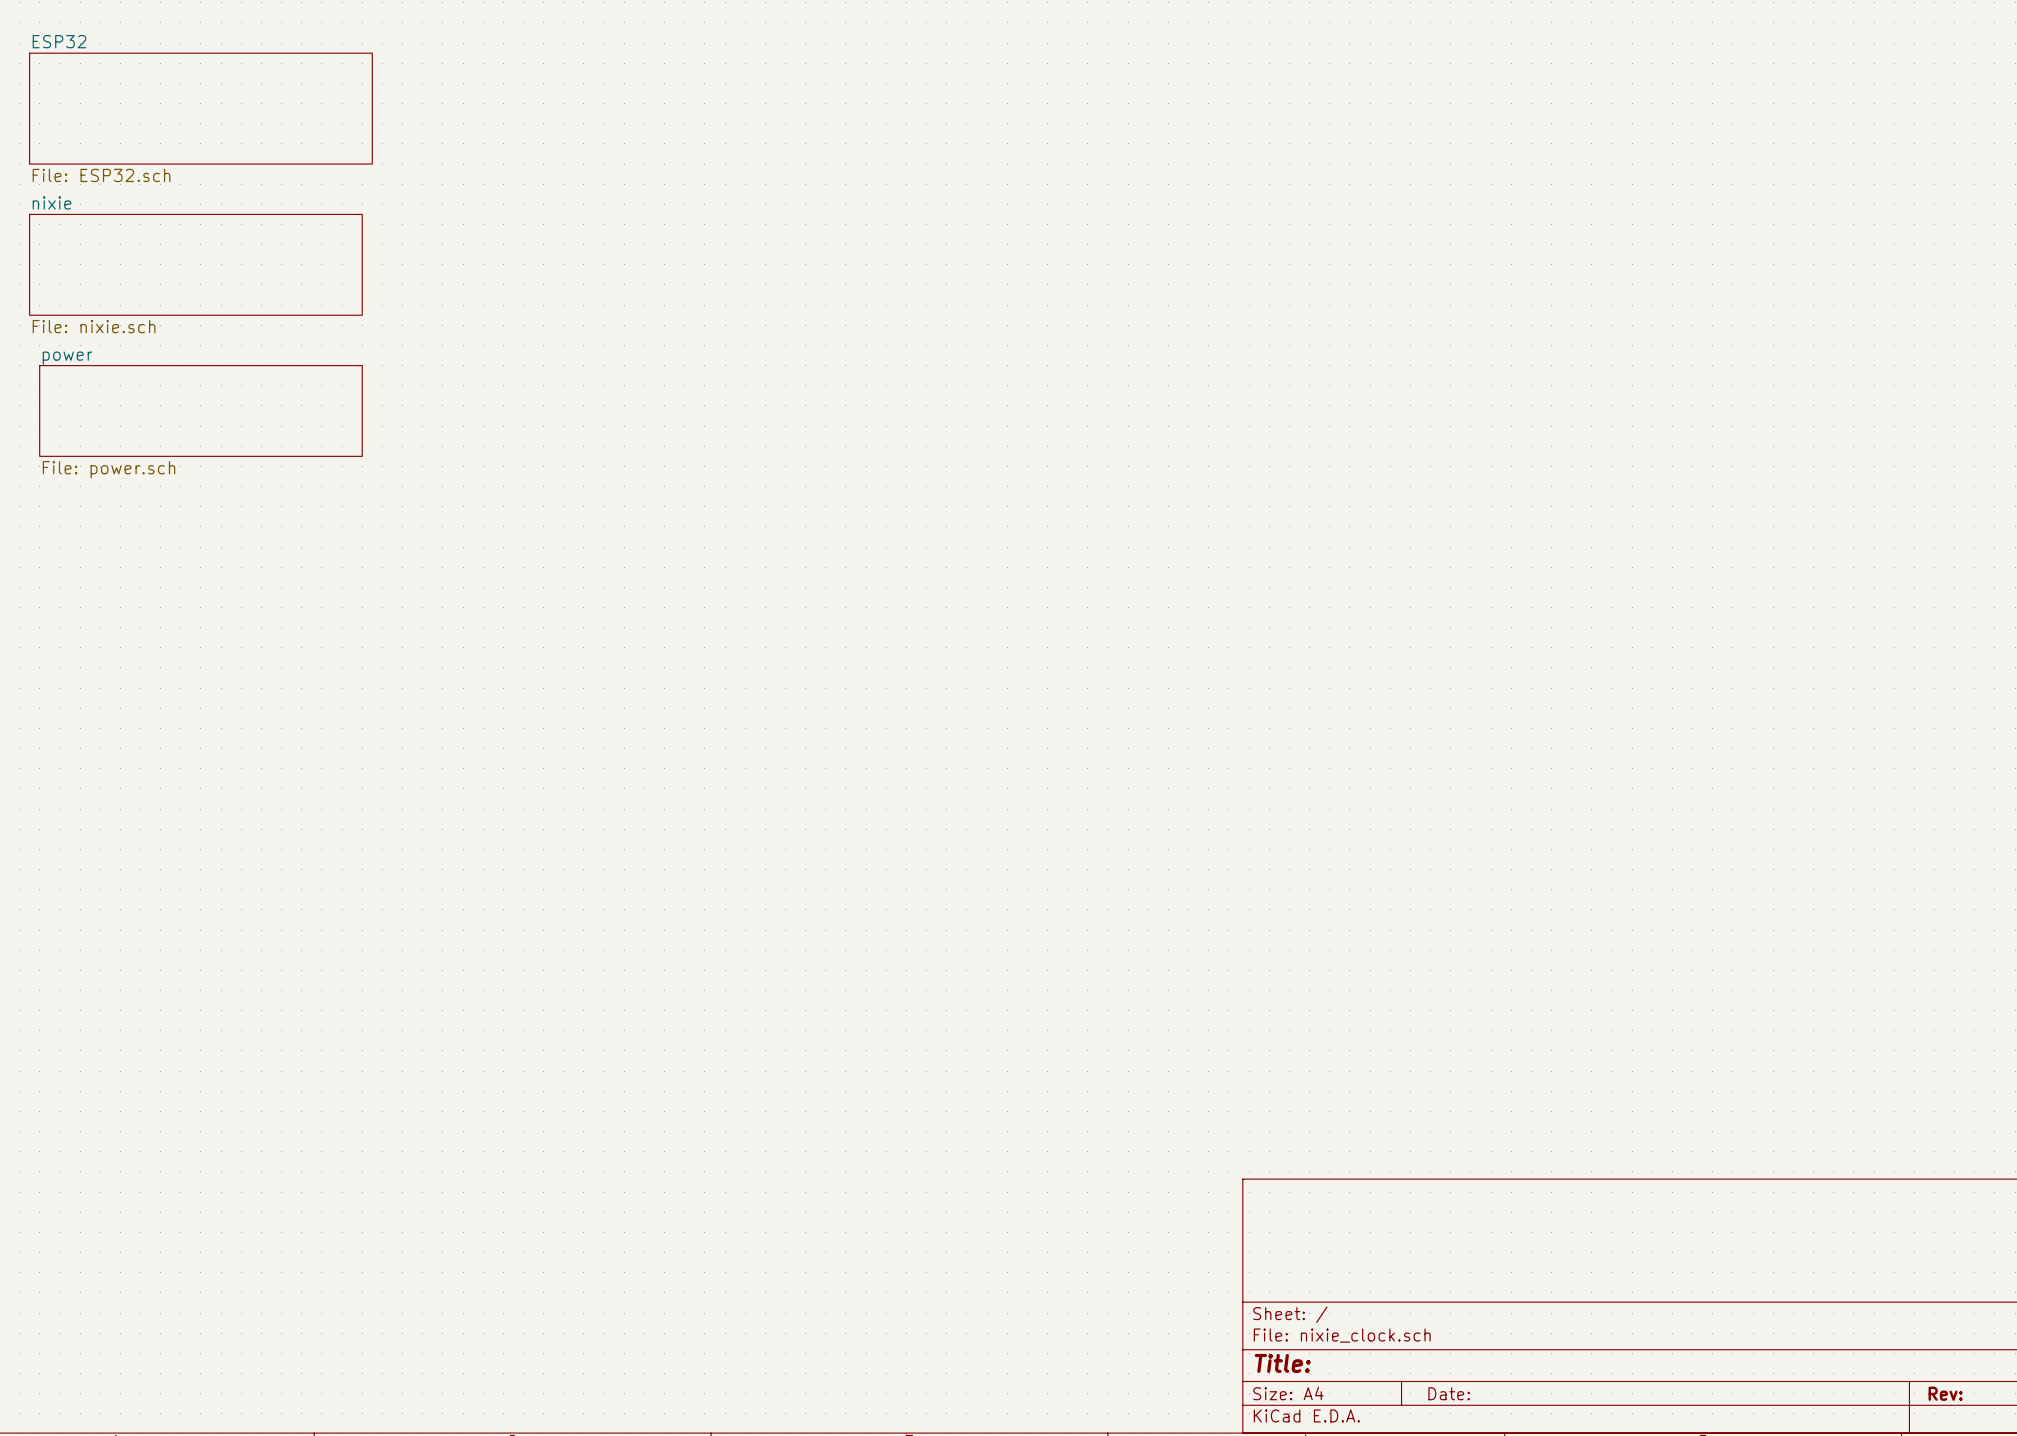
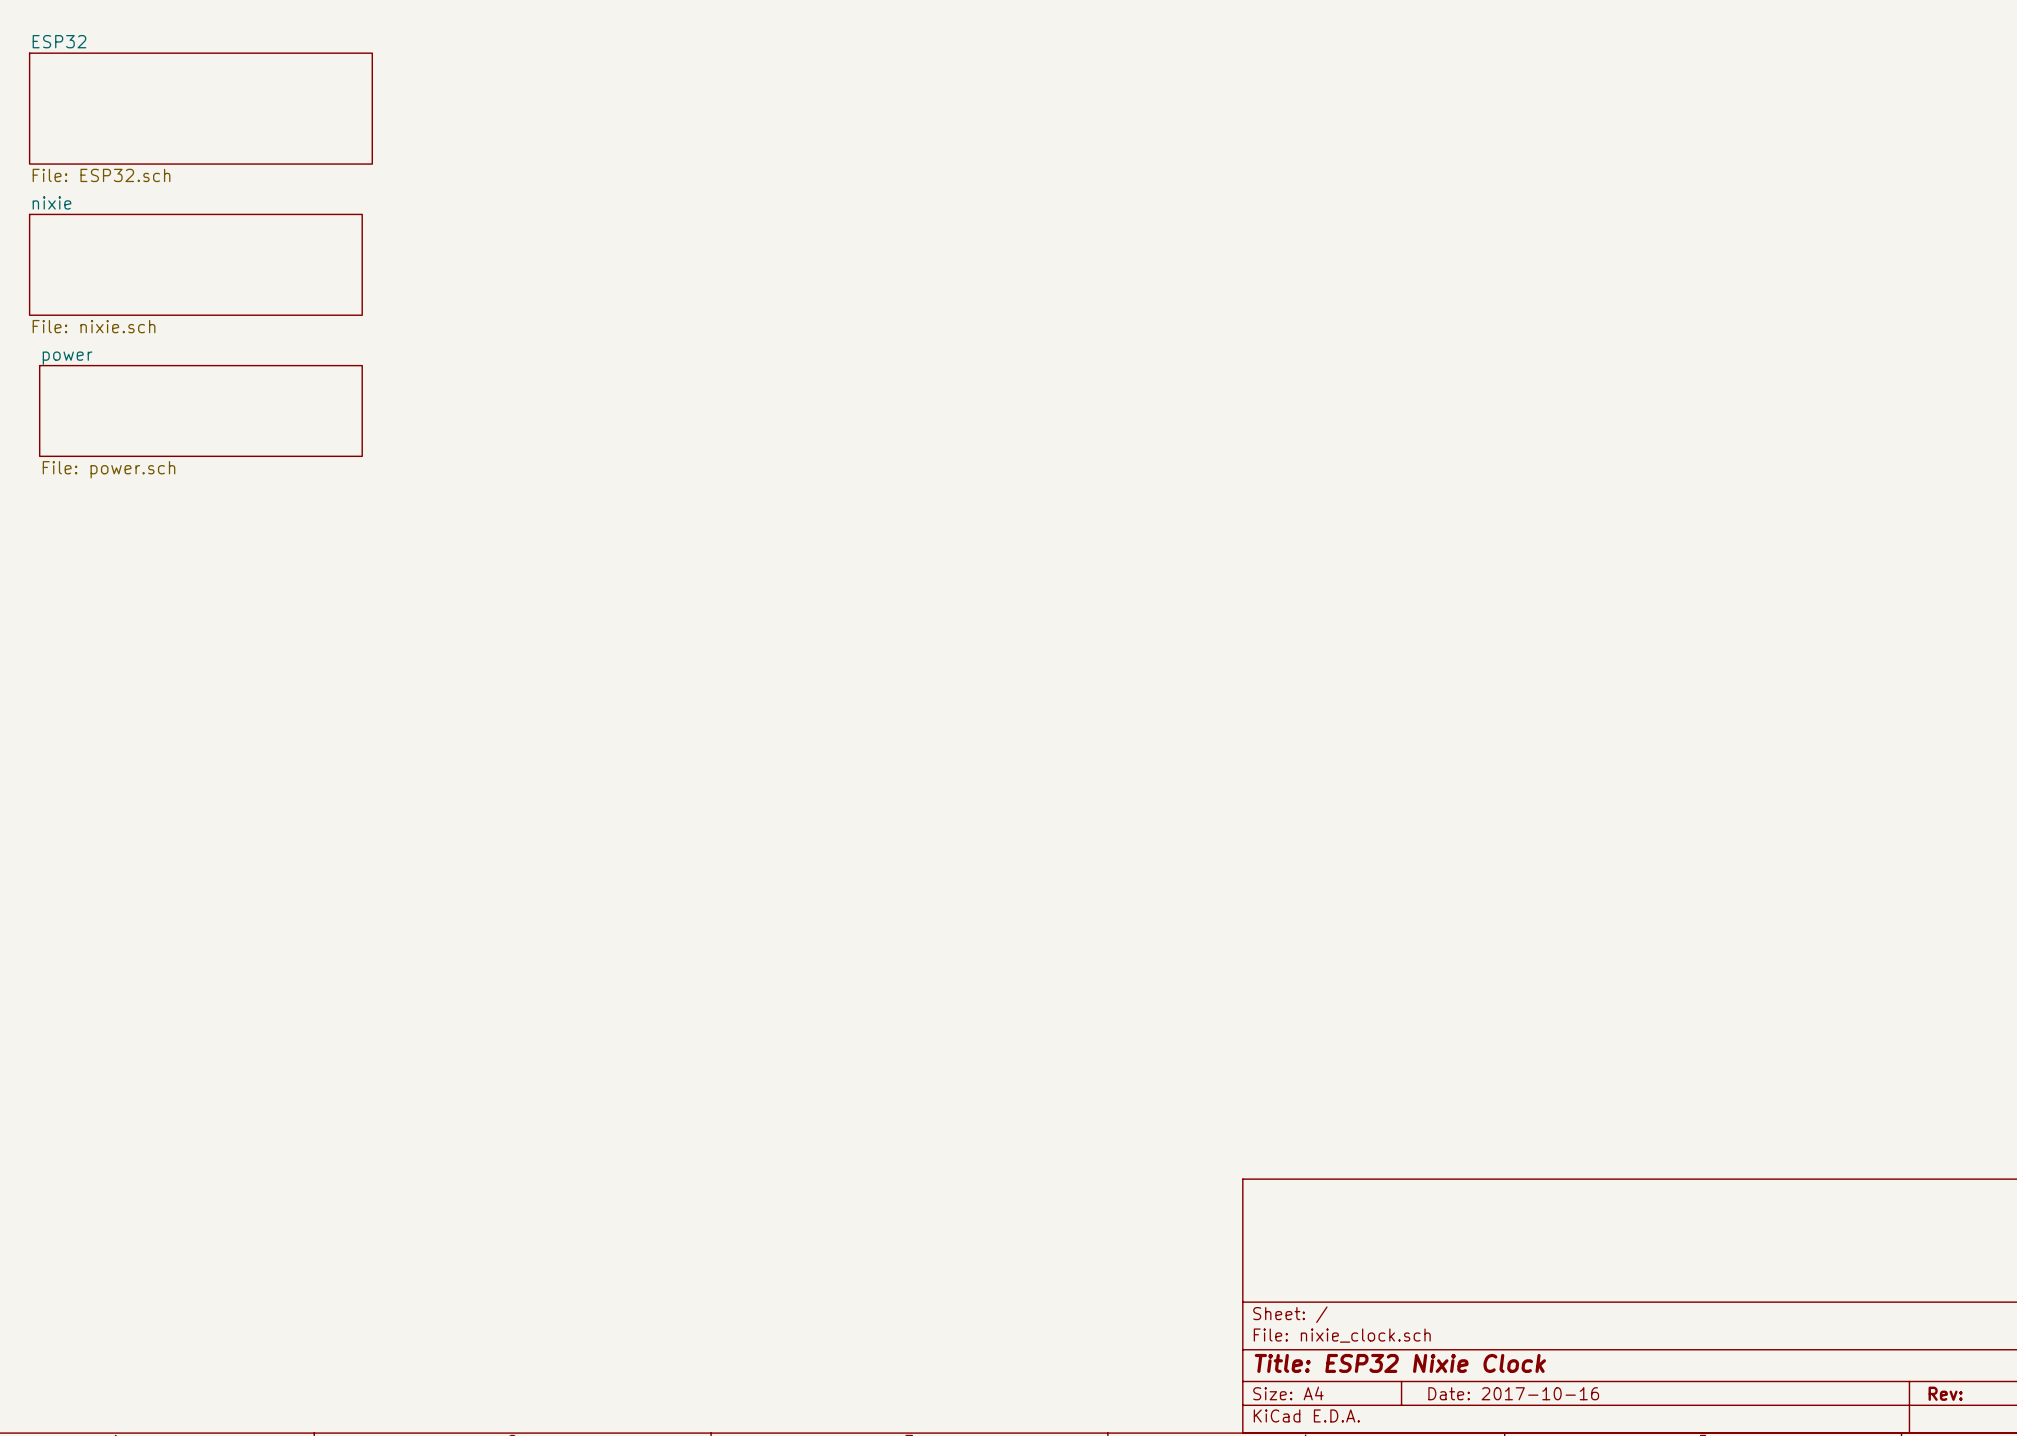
title block: Title: (1282, 1363) -> Title: ESP32 Nixie Clock (1400, 1363)
title block: Date: (1449, 1393) -> Date: 2017-10-16 (1513, 1393)

